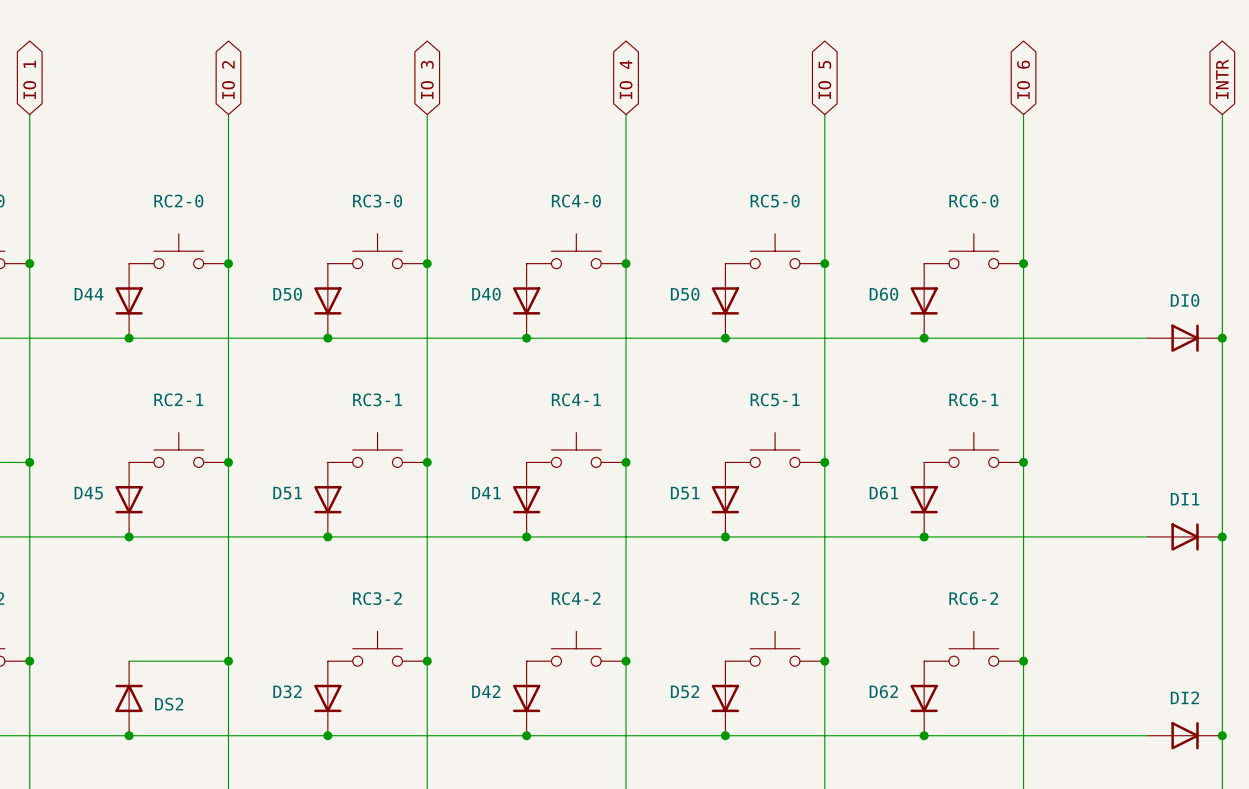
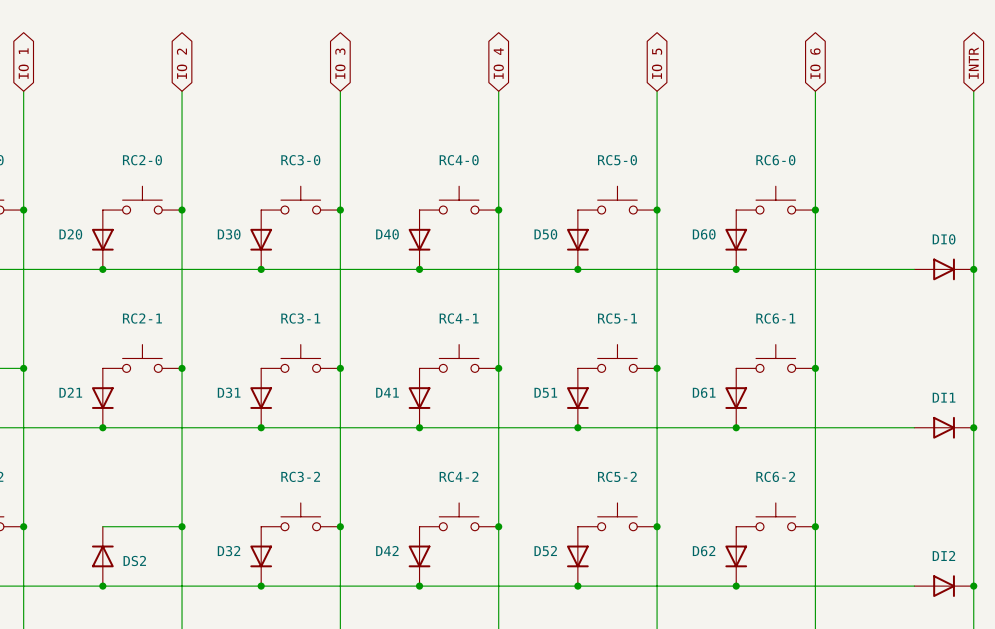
D44 name: D44 (89, 294) -> D20 (70, 234)
D50 name: D50 (287, 294) -> D30 (229, 234)
D45 name: D45 (88, 493) -> D21 (70, 392)
D51 name: D51 (287, 493) -> D31 (229, 392)

